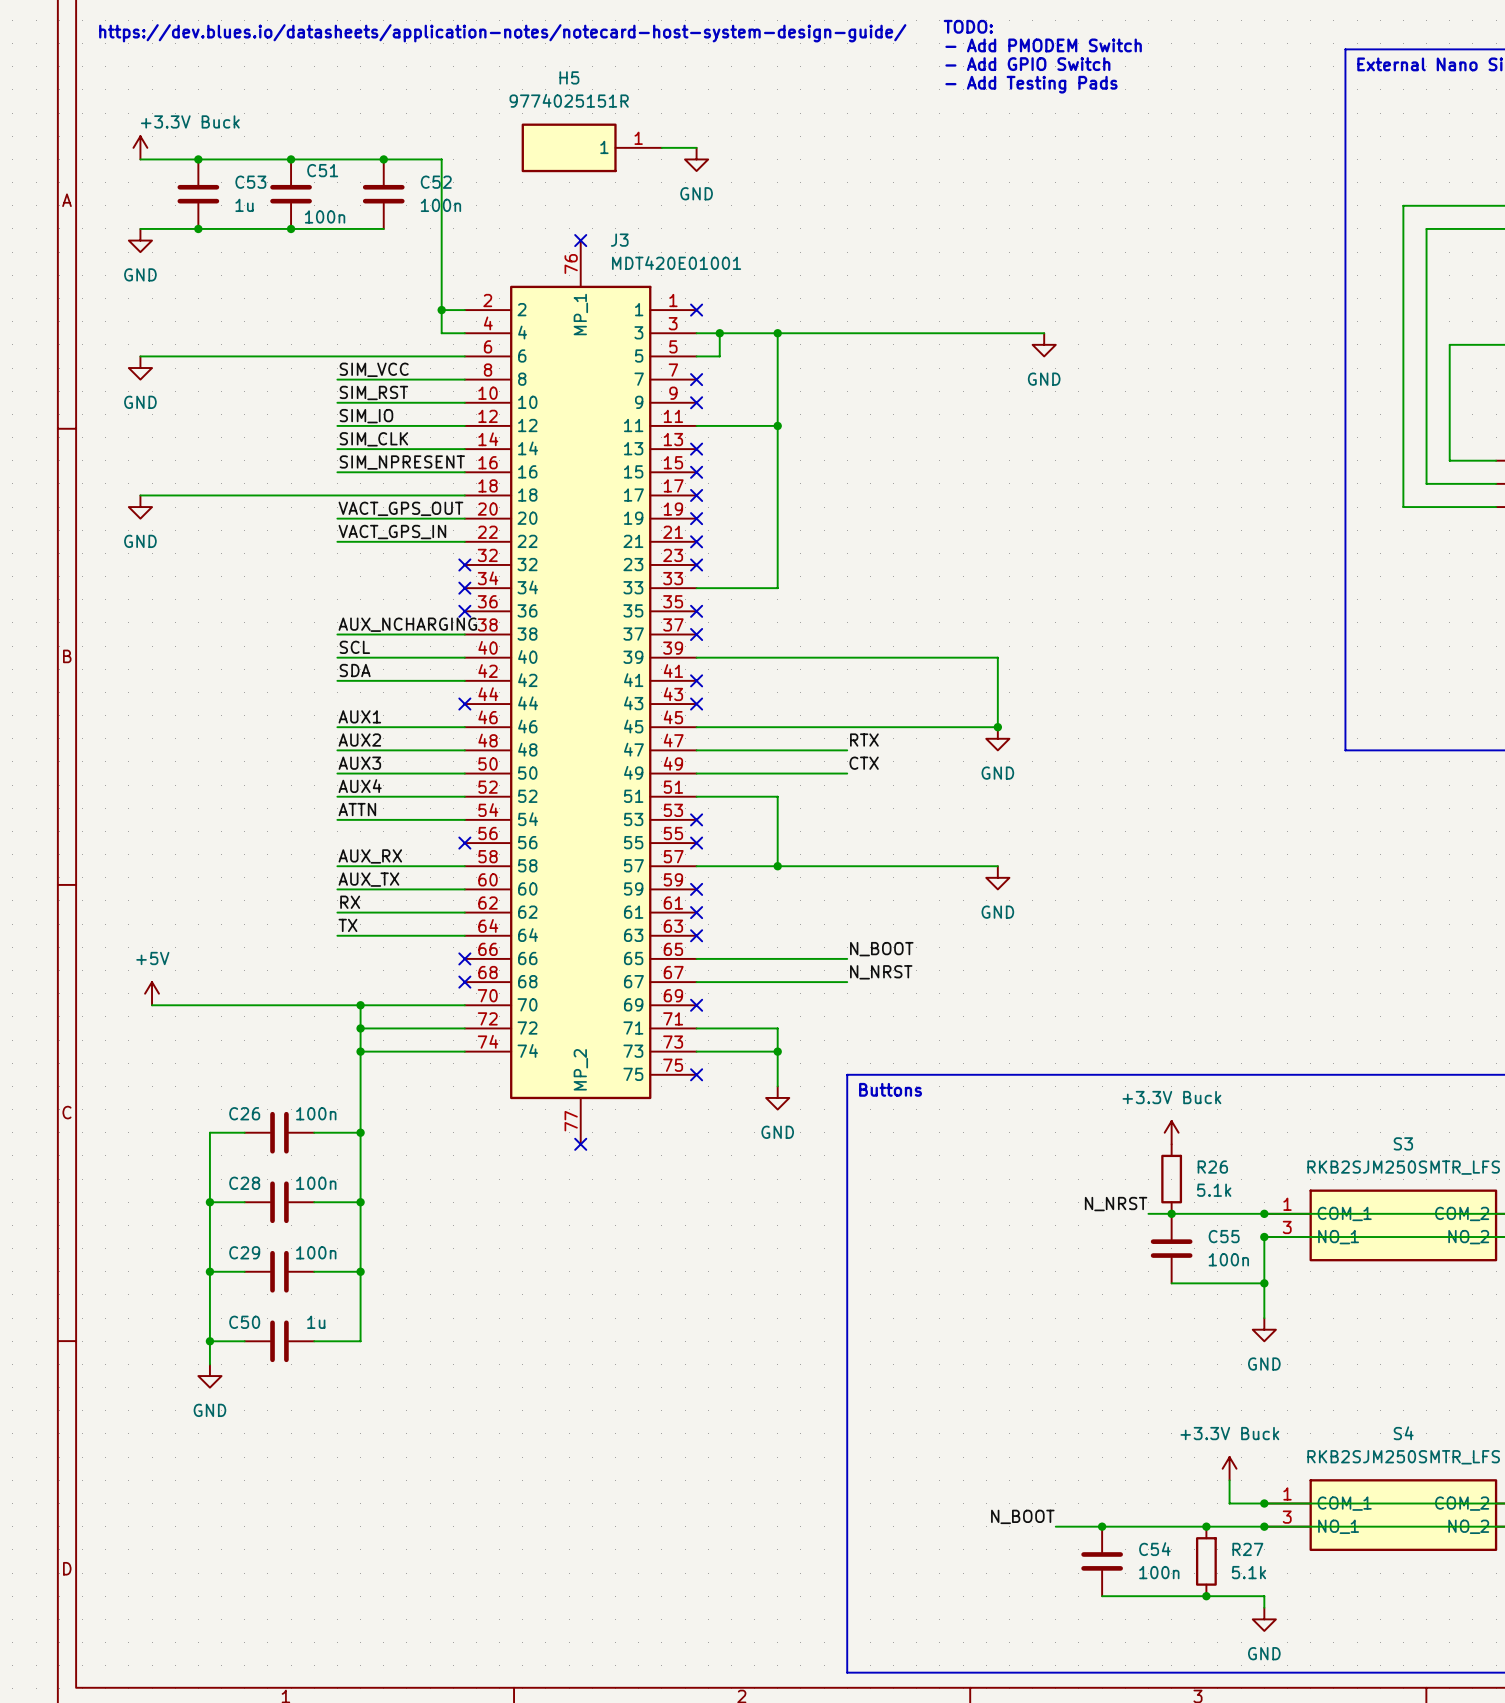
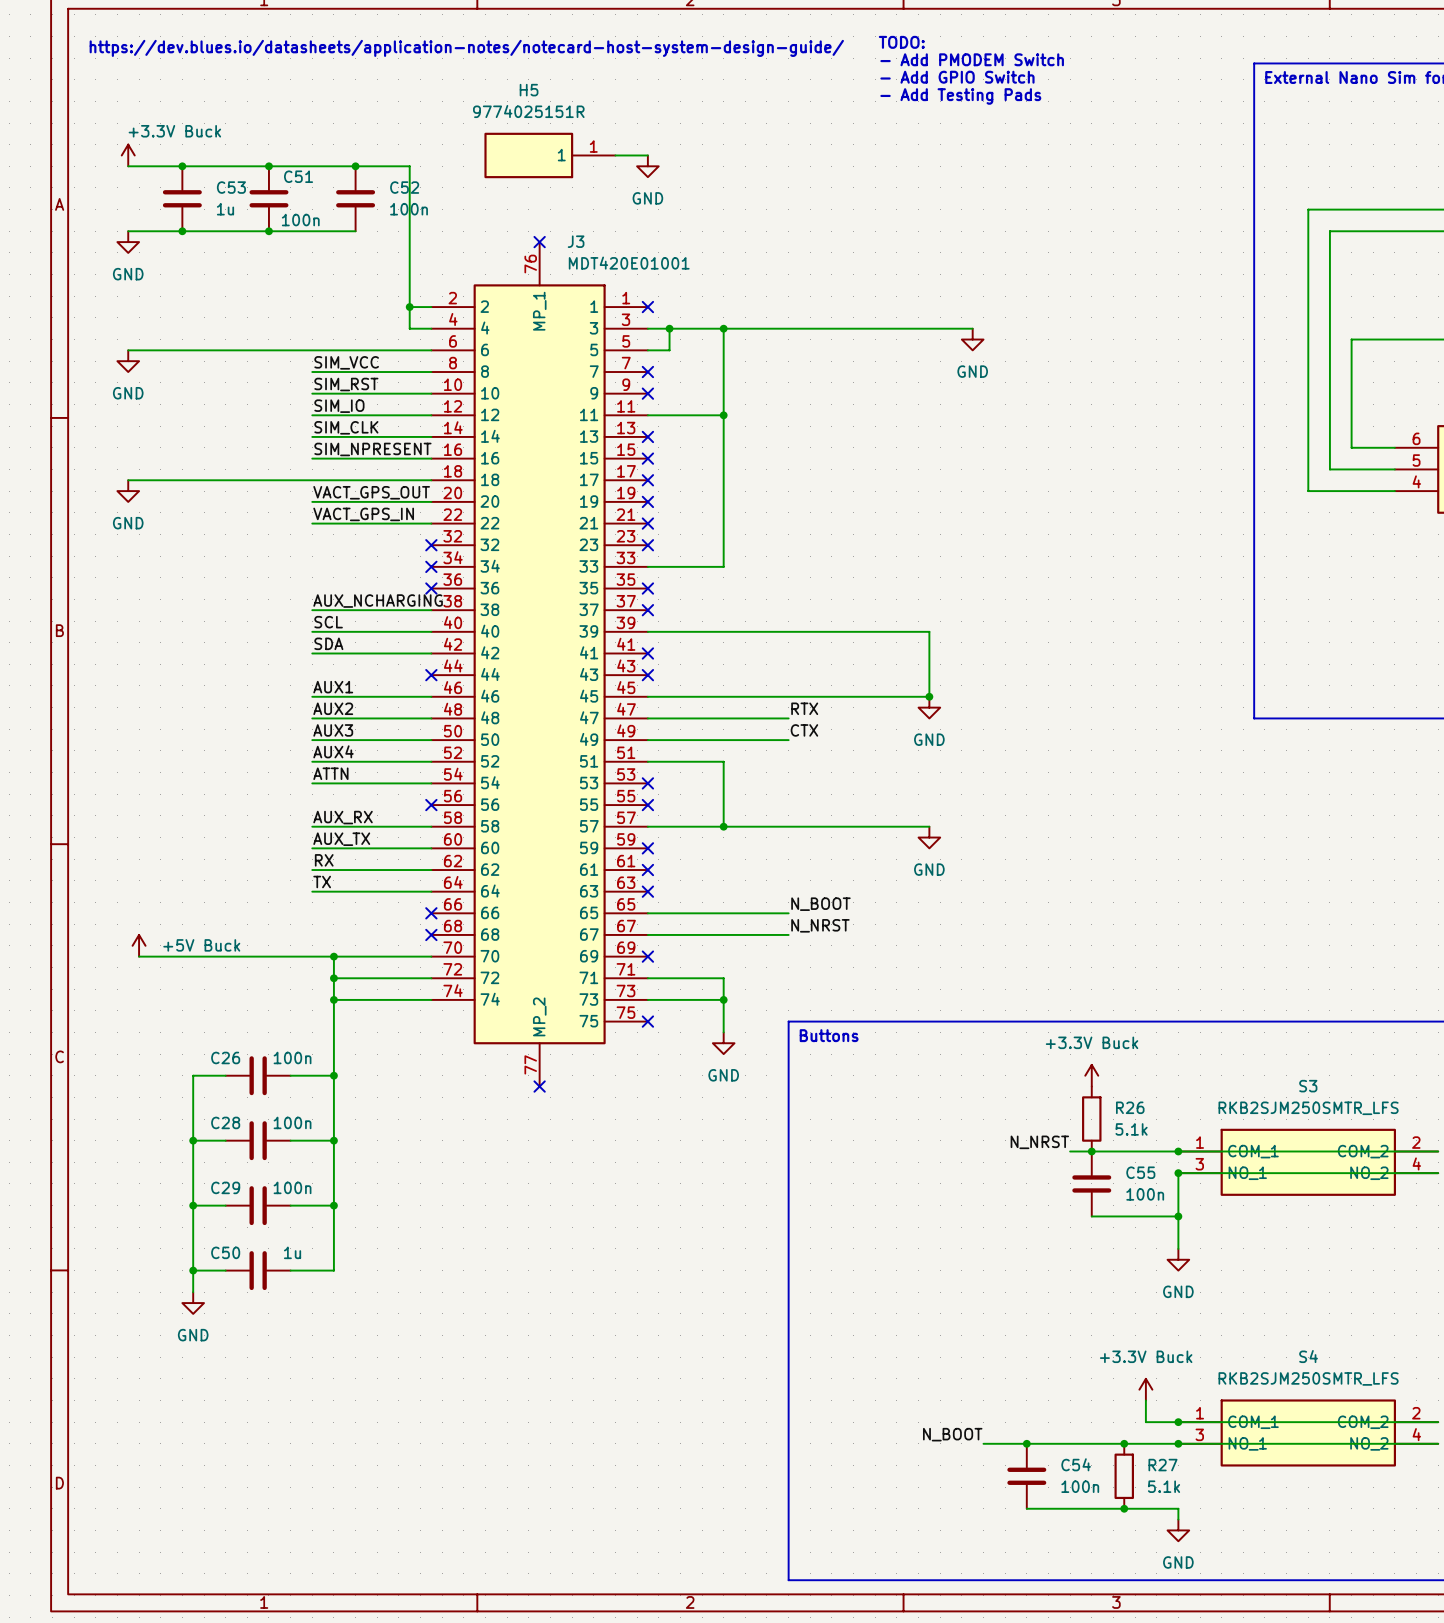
power symbol: +5V (152, 993) -> +5V Buck (139, 945)

